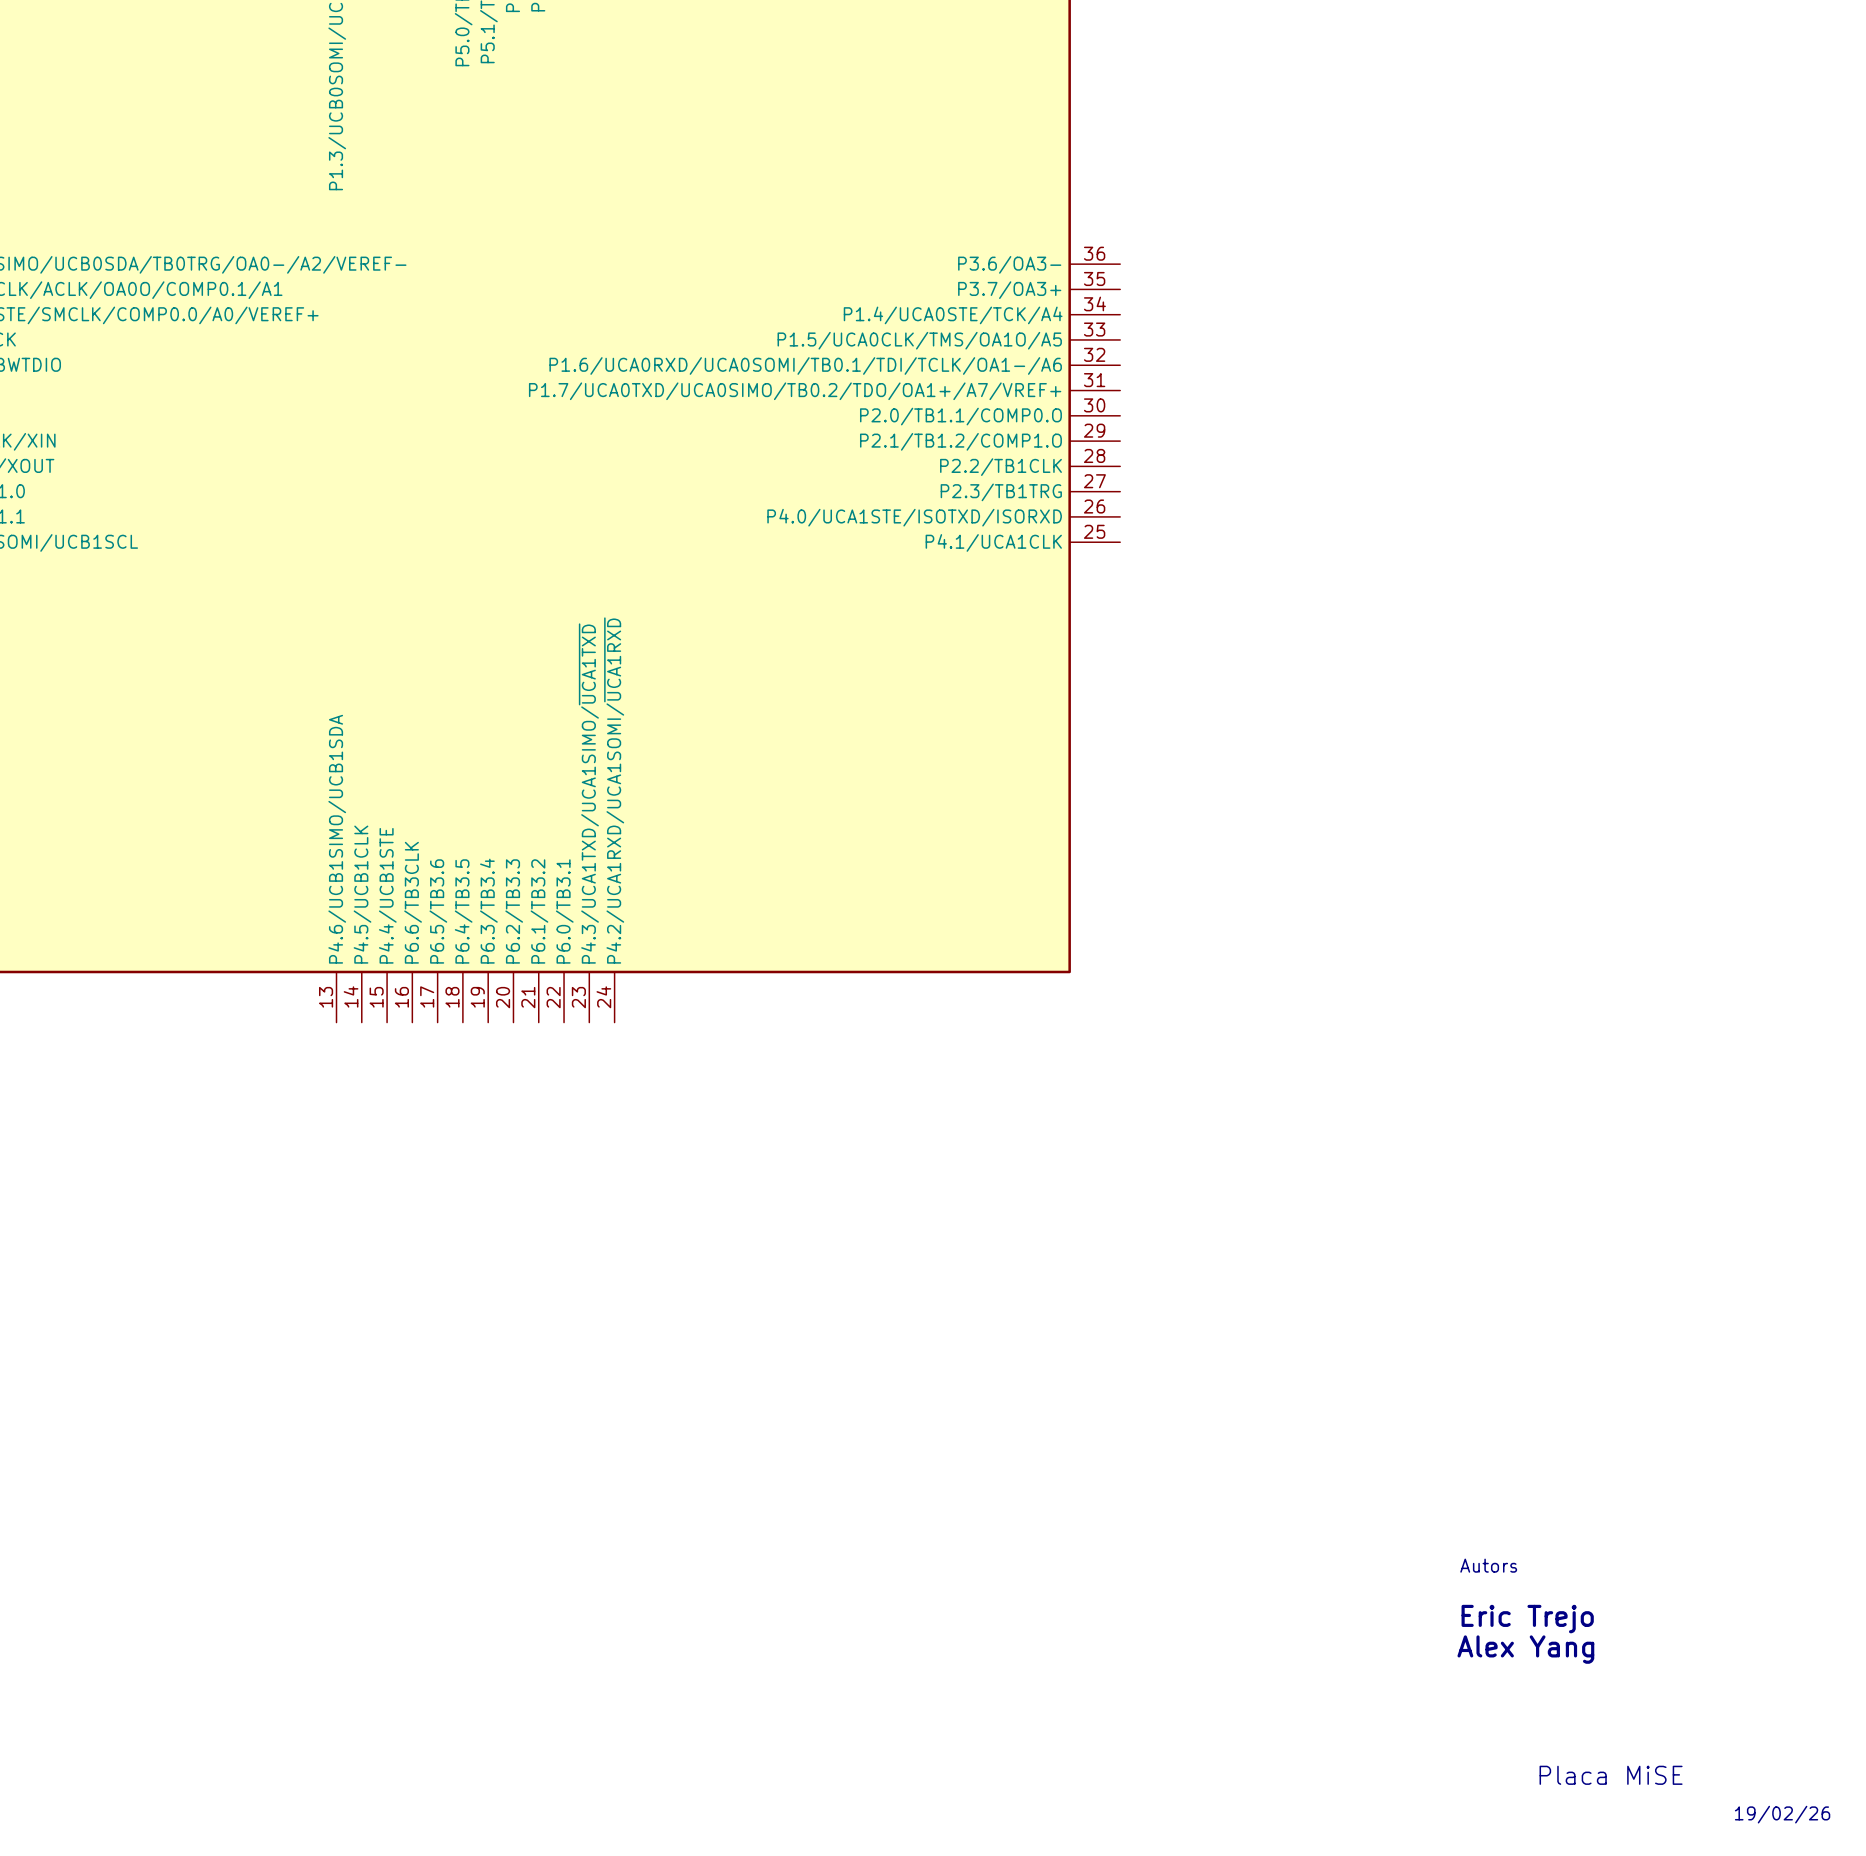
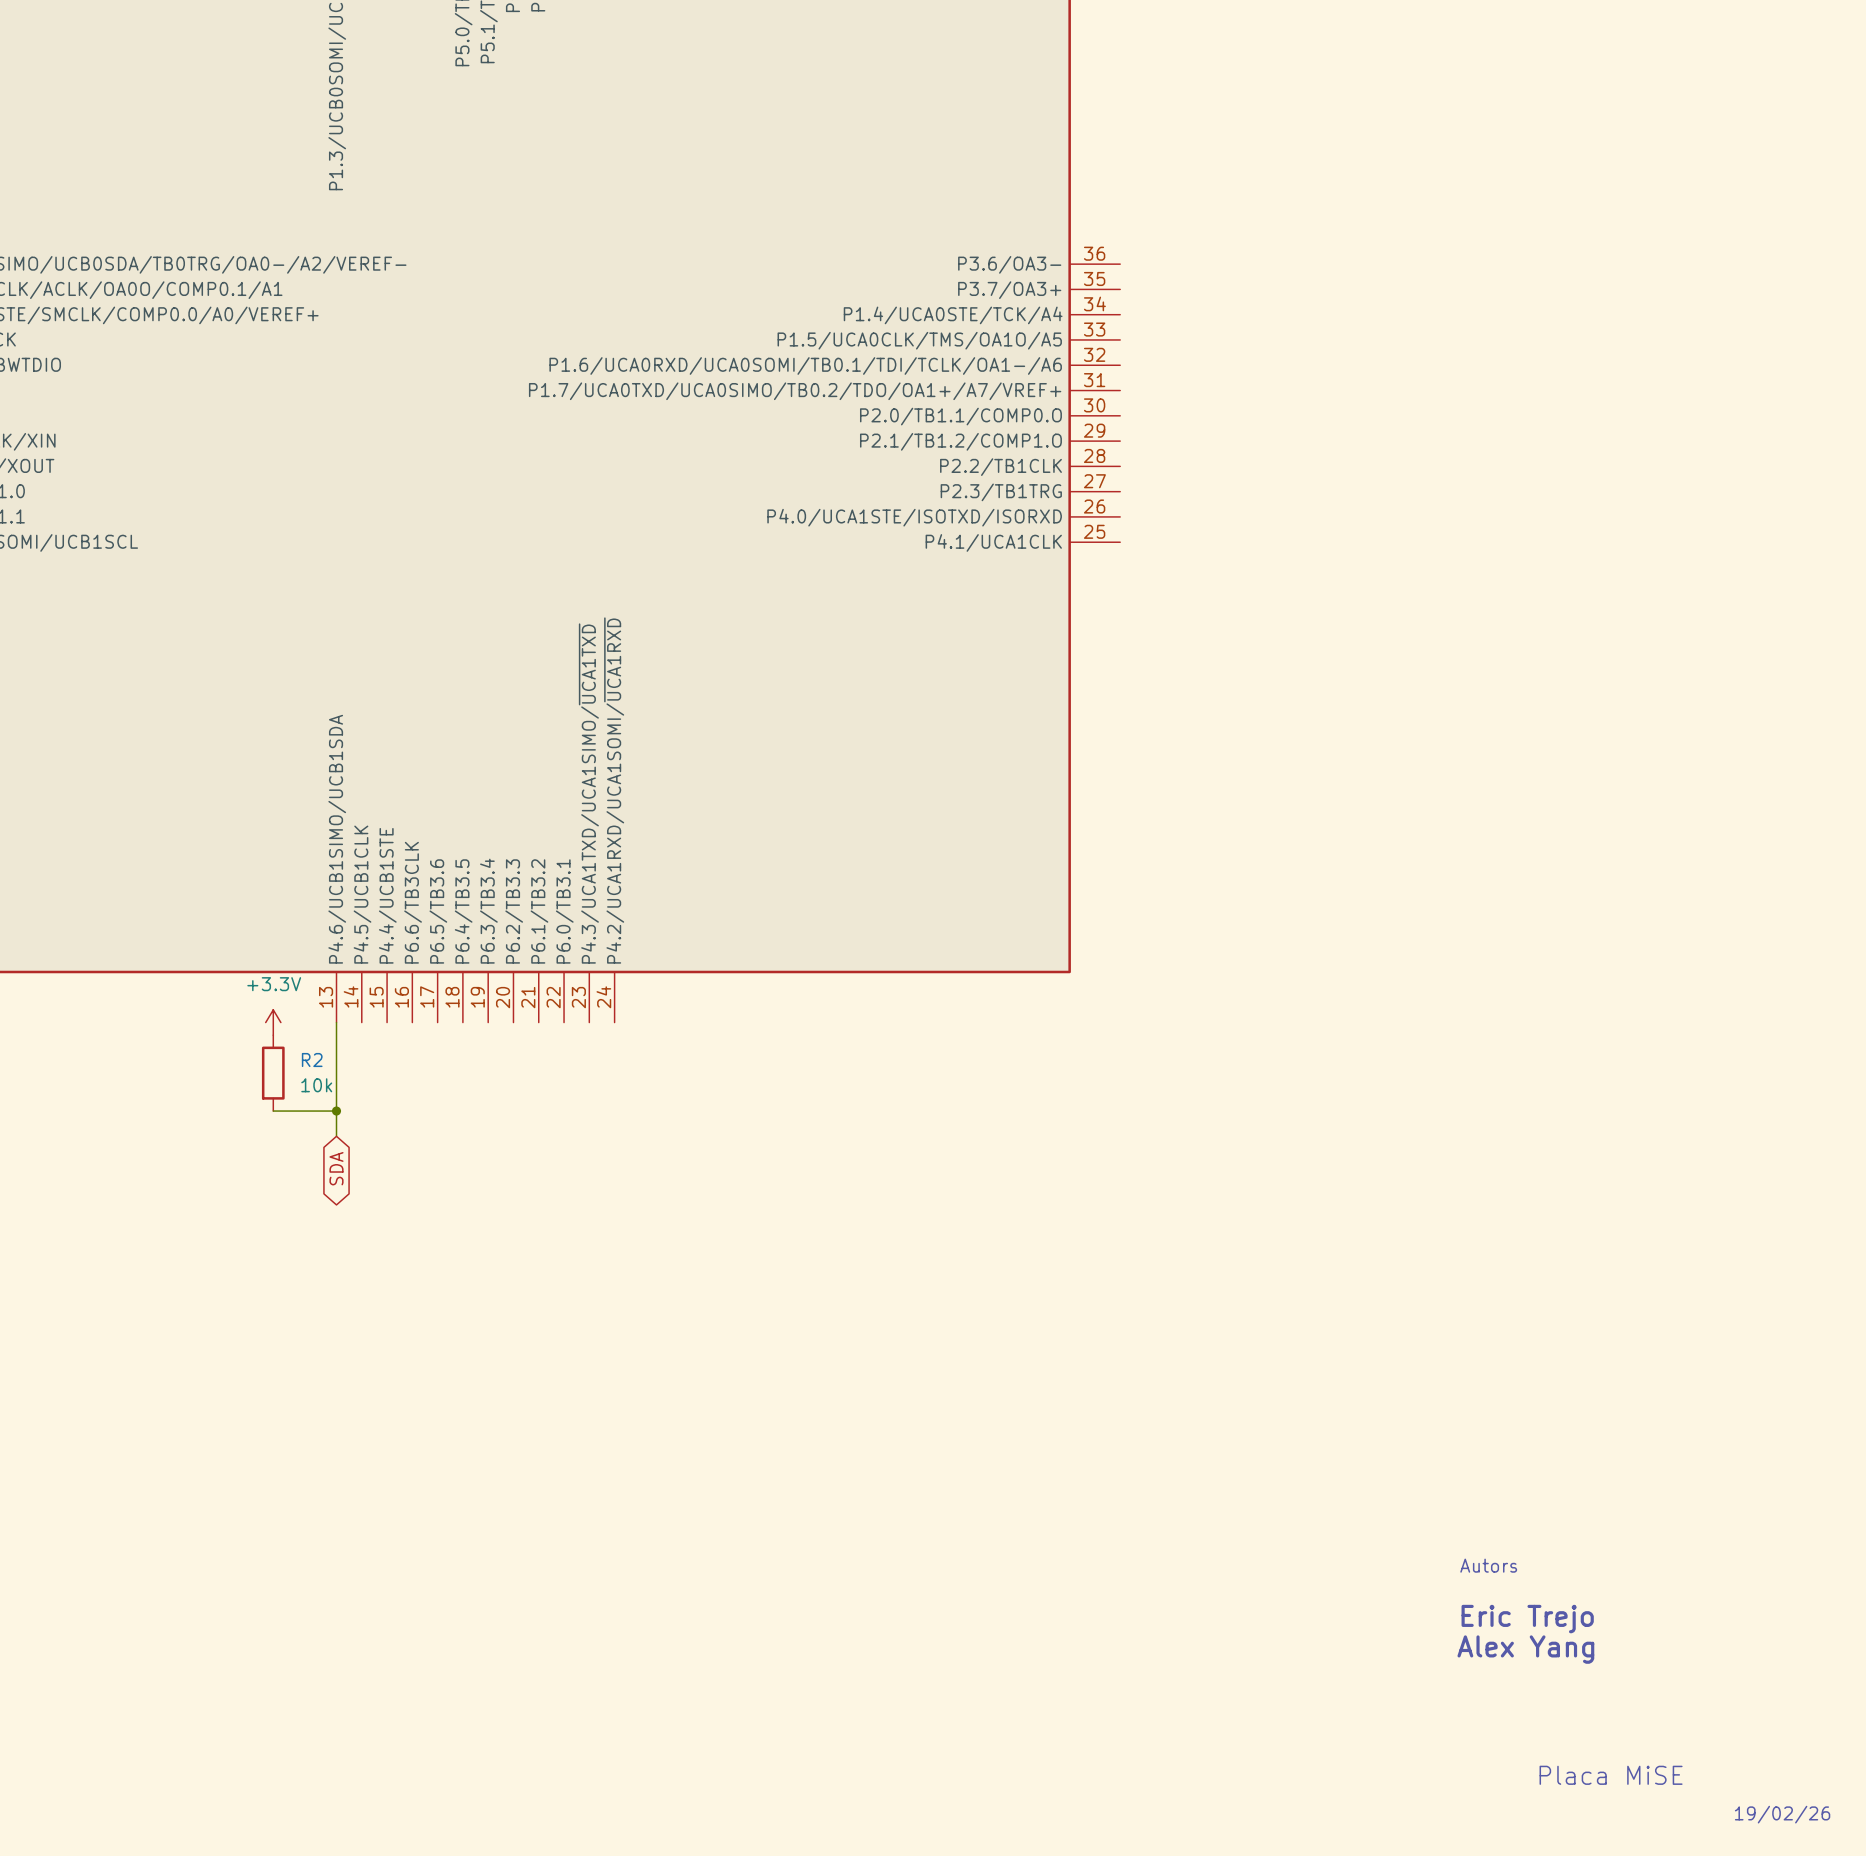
power symbol: none -> +3.3V (273, 1022)
wire: none -> (336, 1022) (336, 1136)
R2: none -> 10k (273, 1073)
wire: none -> (273, 1111) (336, 1111)
junction: none -> (336, 1111)
global label: none -> SDA (336, 1168)

